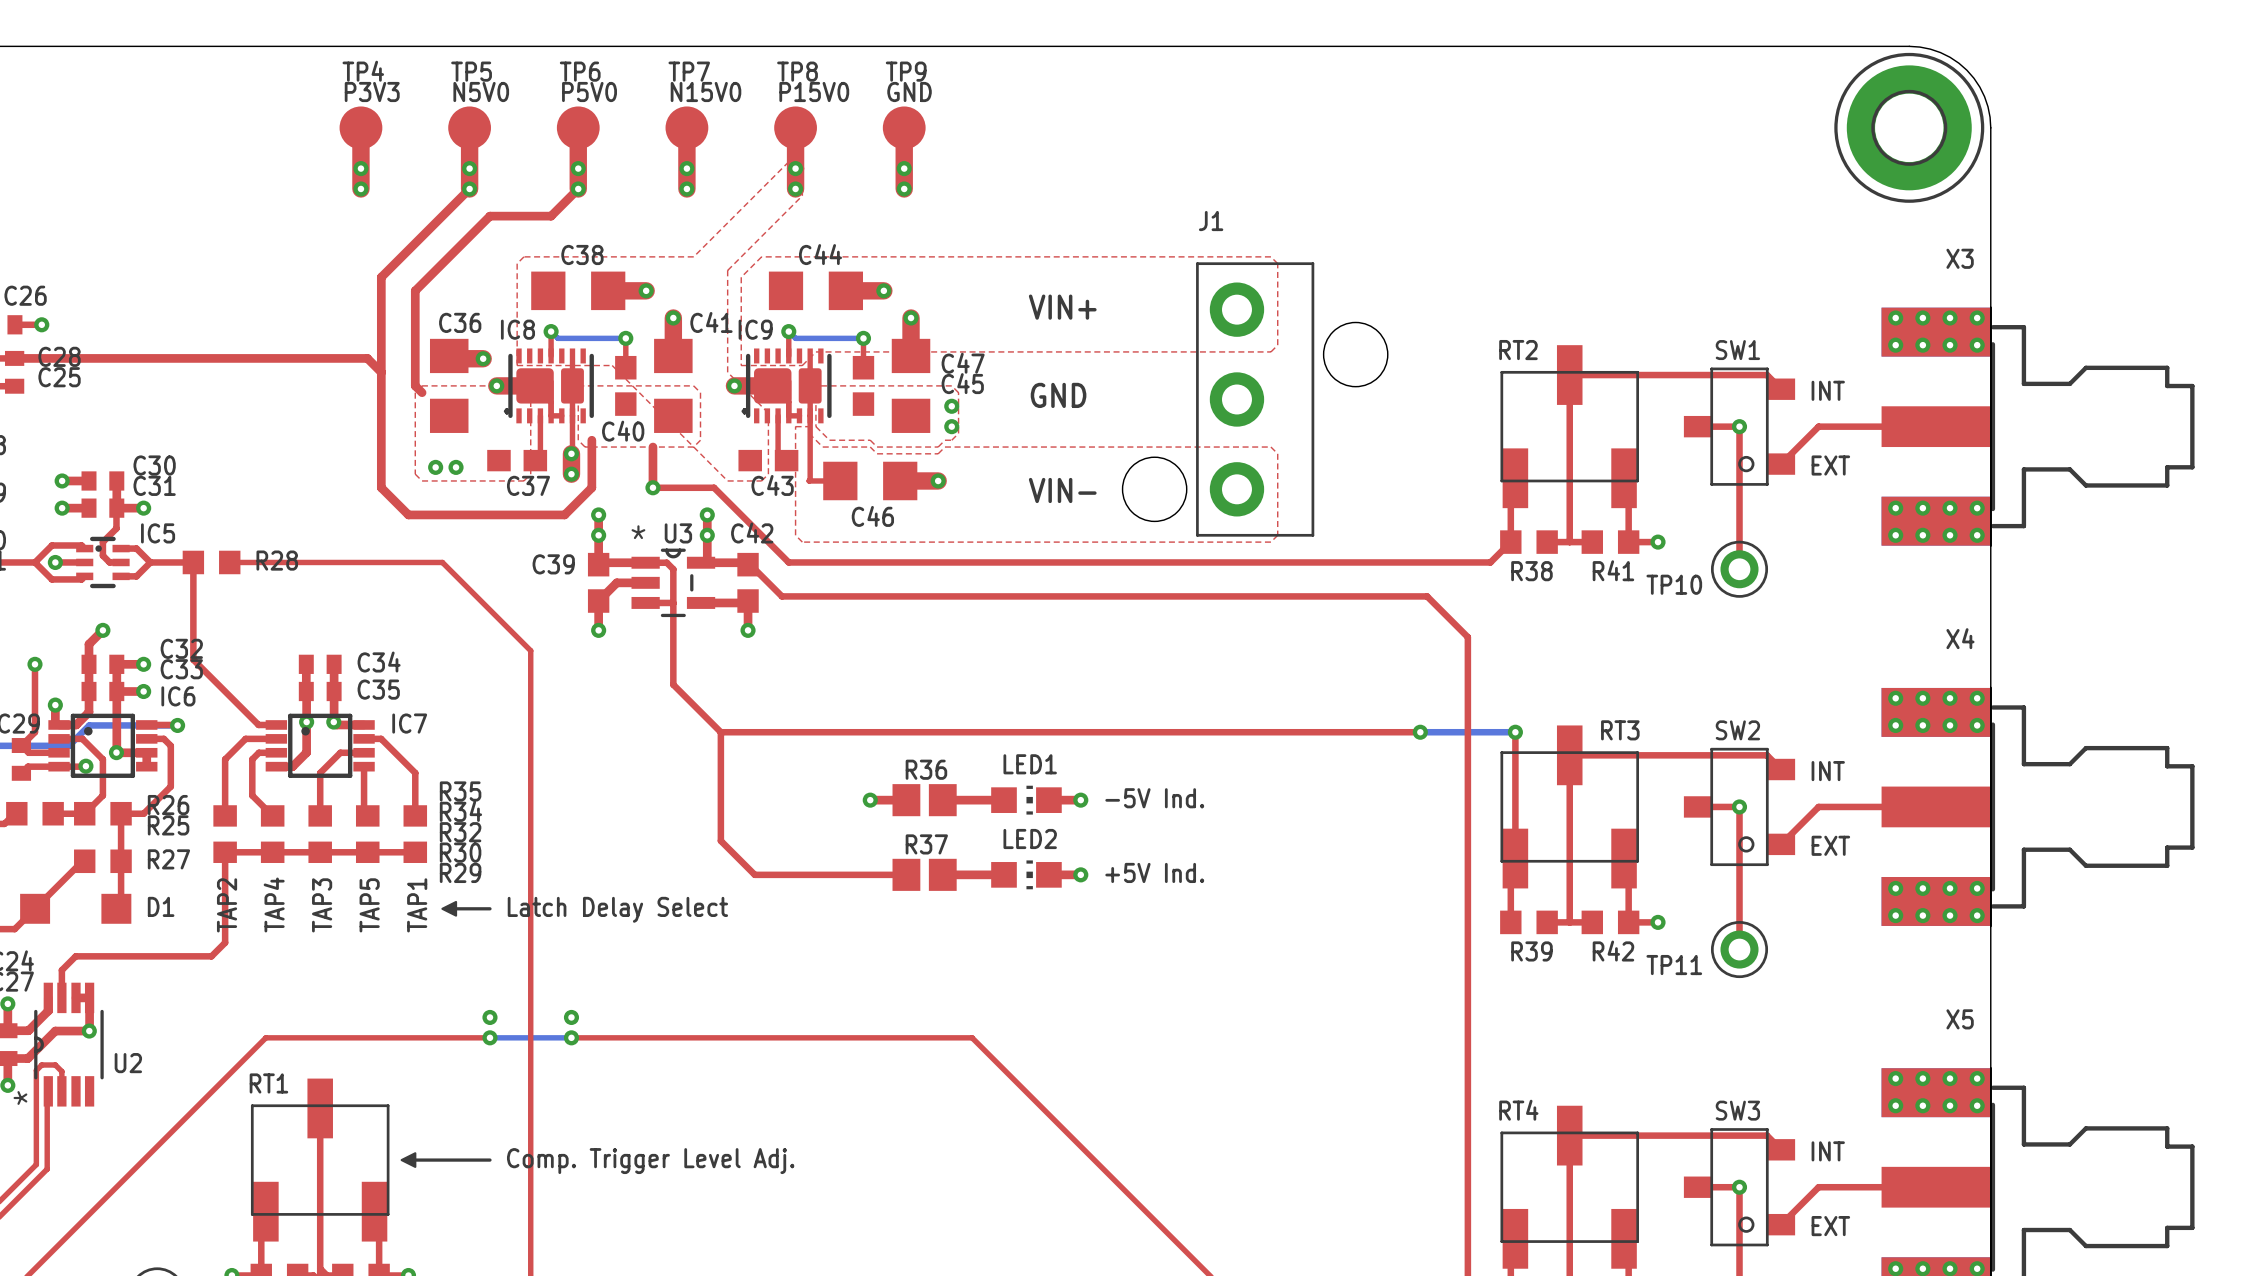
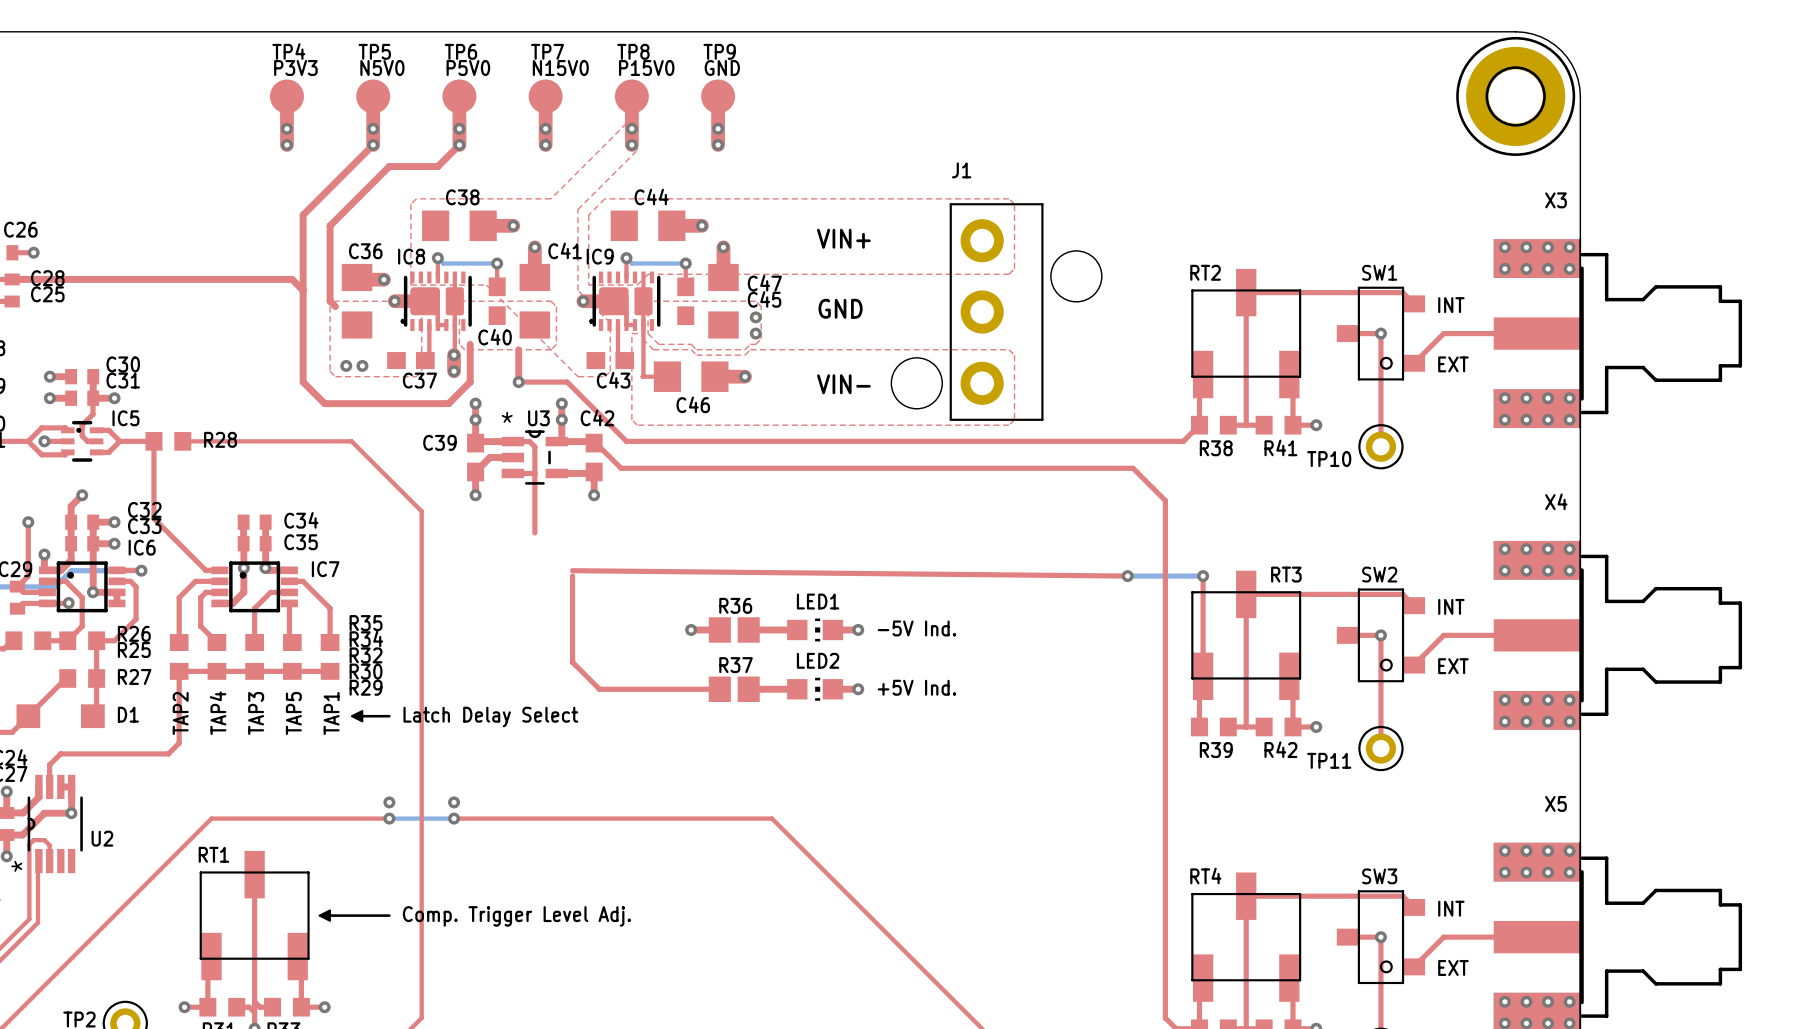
top track: (673, 677) (673, 684) (720, 732) (1420, 732) -> (572, 570) (1127, 576)

